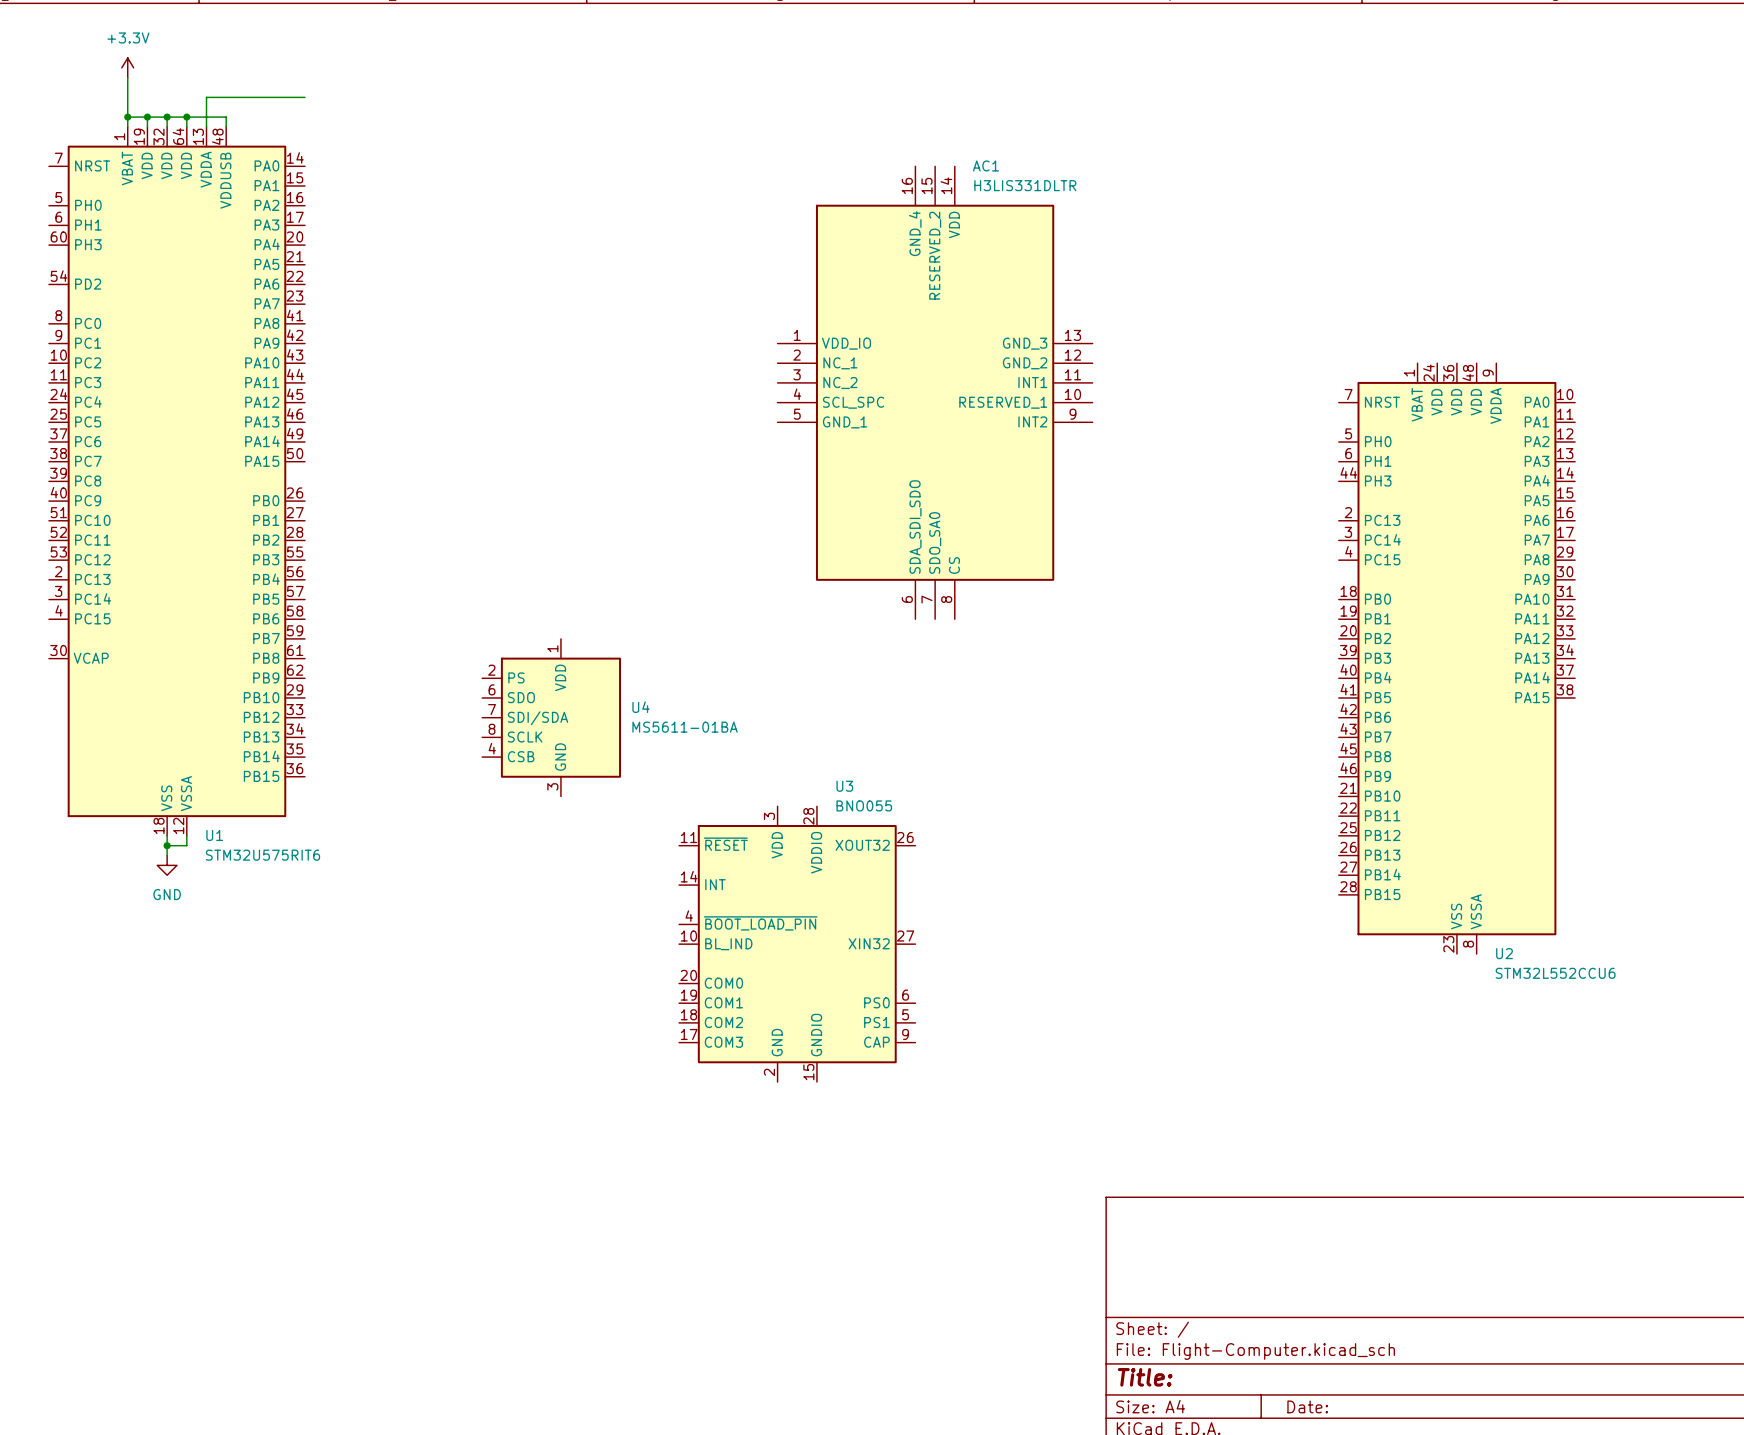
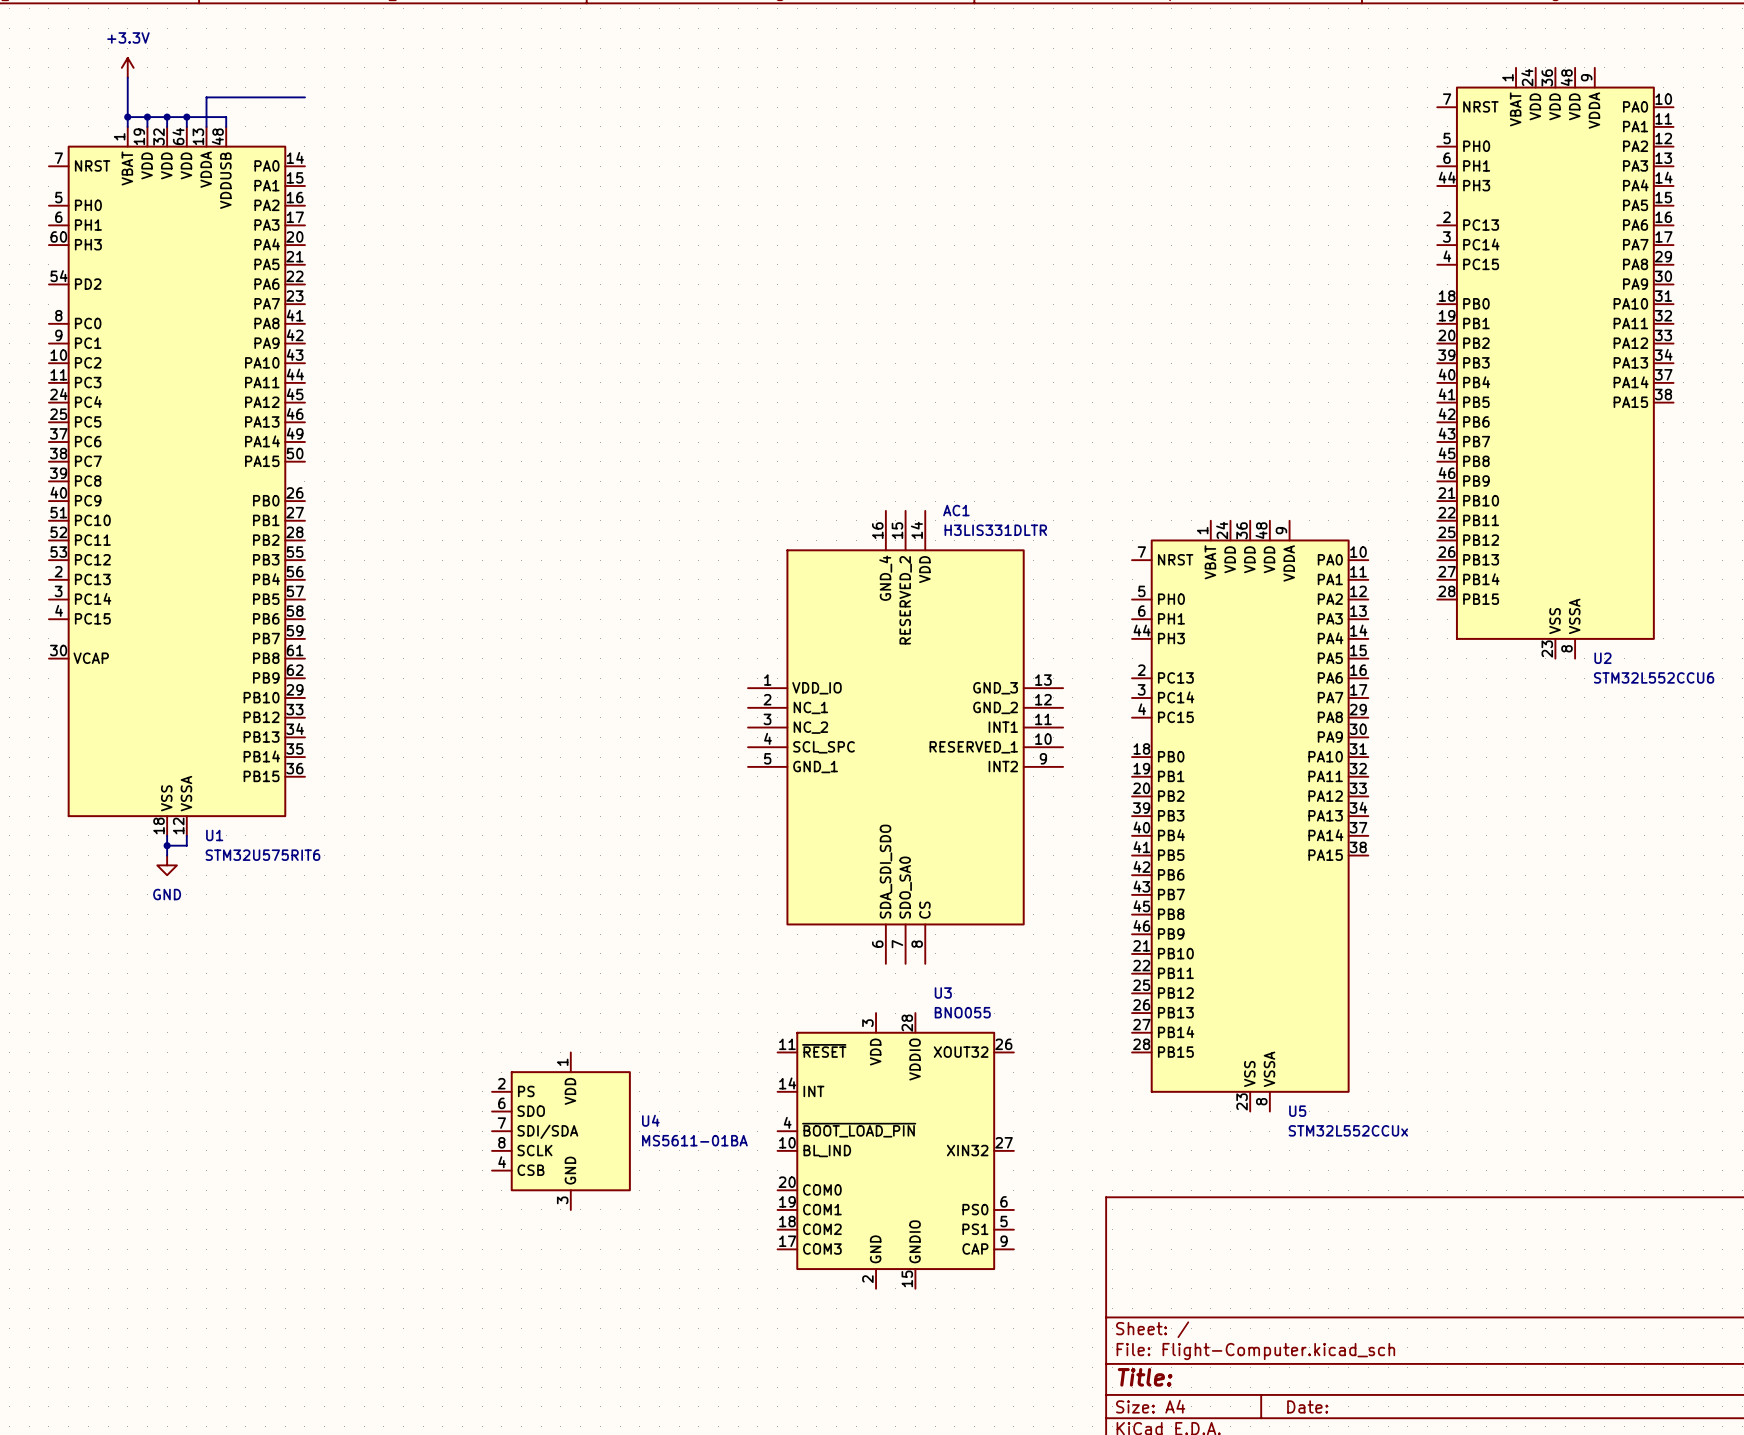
AC1 position: (935, 392) -> (905, 737)
U2 position: (1456, 658) -> (1555, 363)
U4 position: (551, 717) -> (561, 1131)
U5: none -> STM32L552CCUx (1250, 816)
U3 position: (797, 944) -> (895, 1150)

